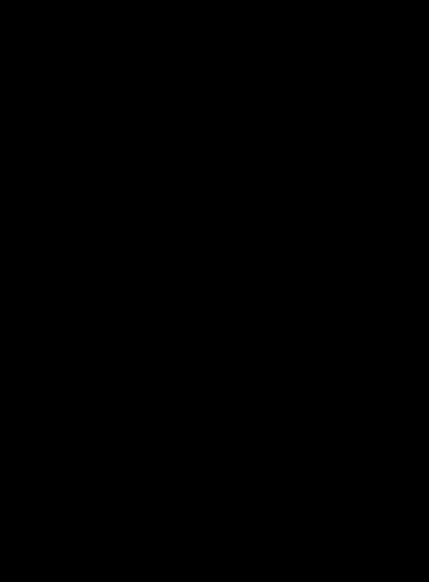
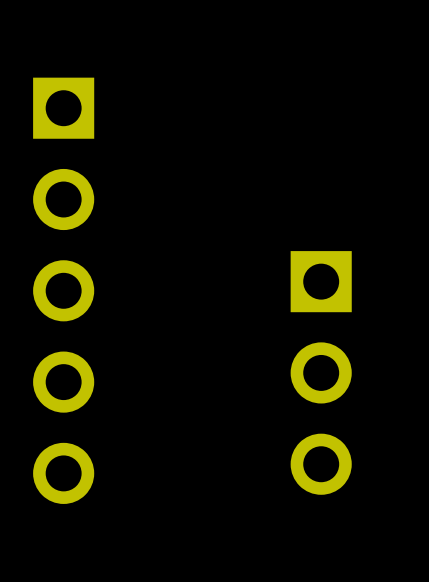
part: none -> (63, 290)
part: none -> (321, 372)

